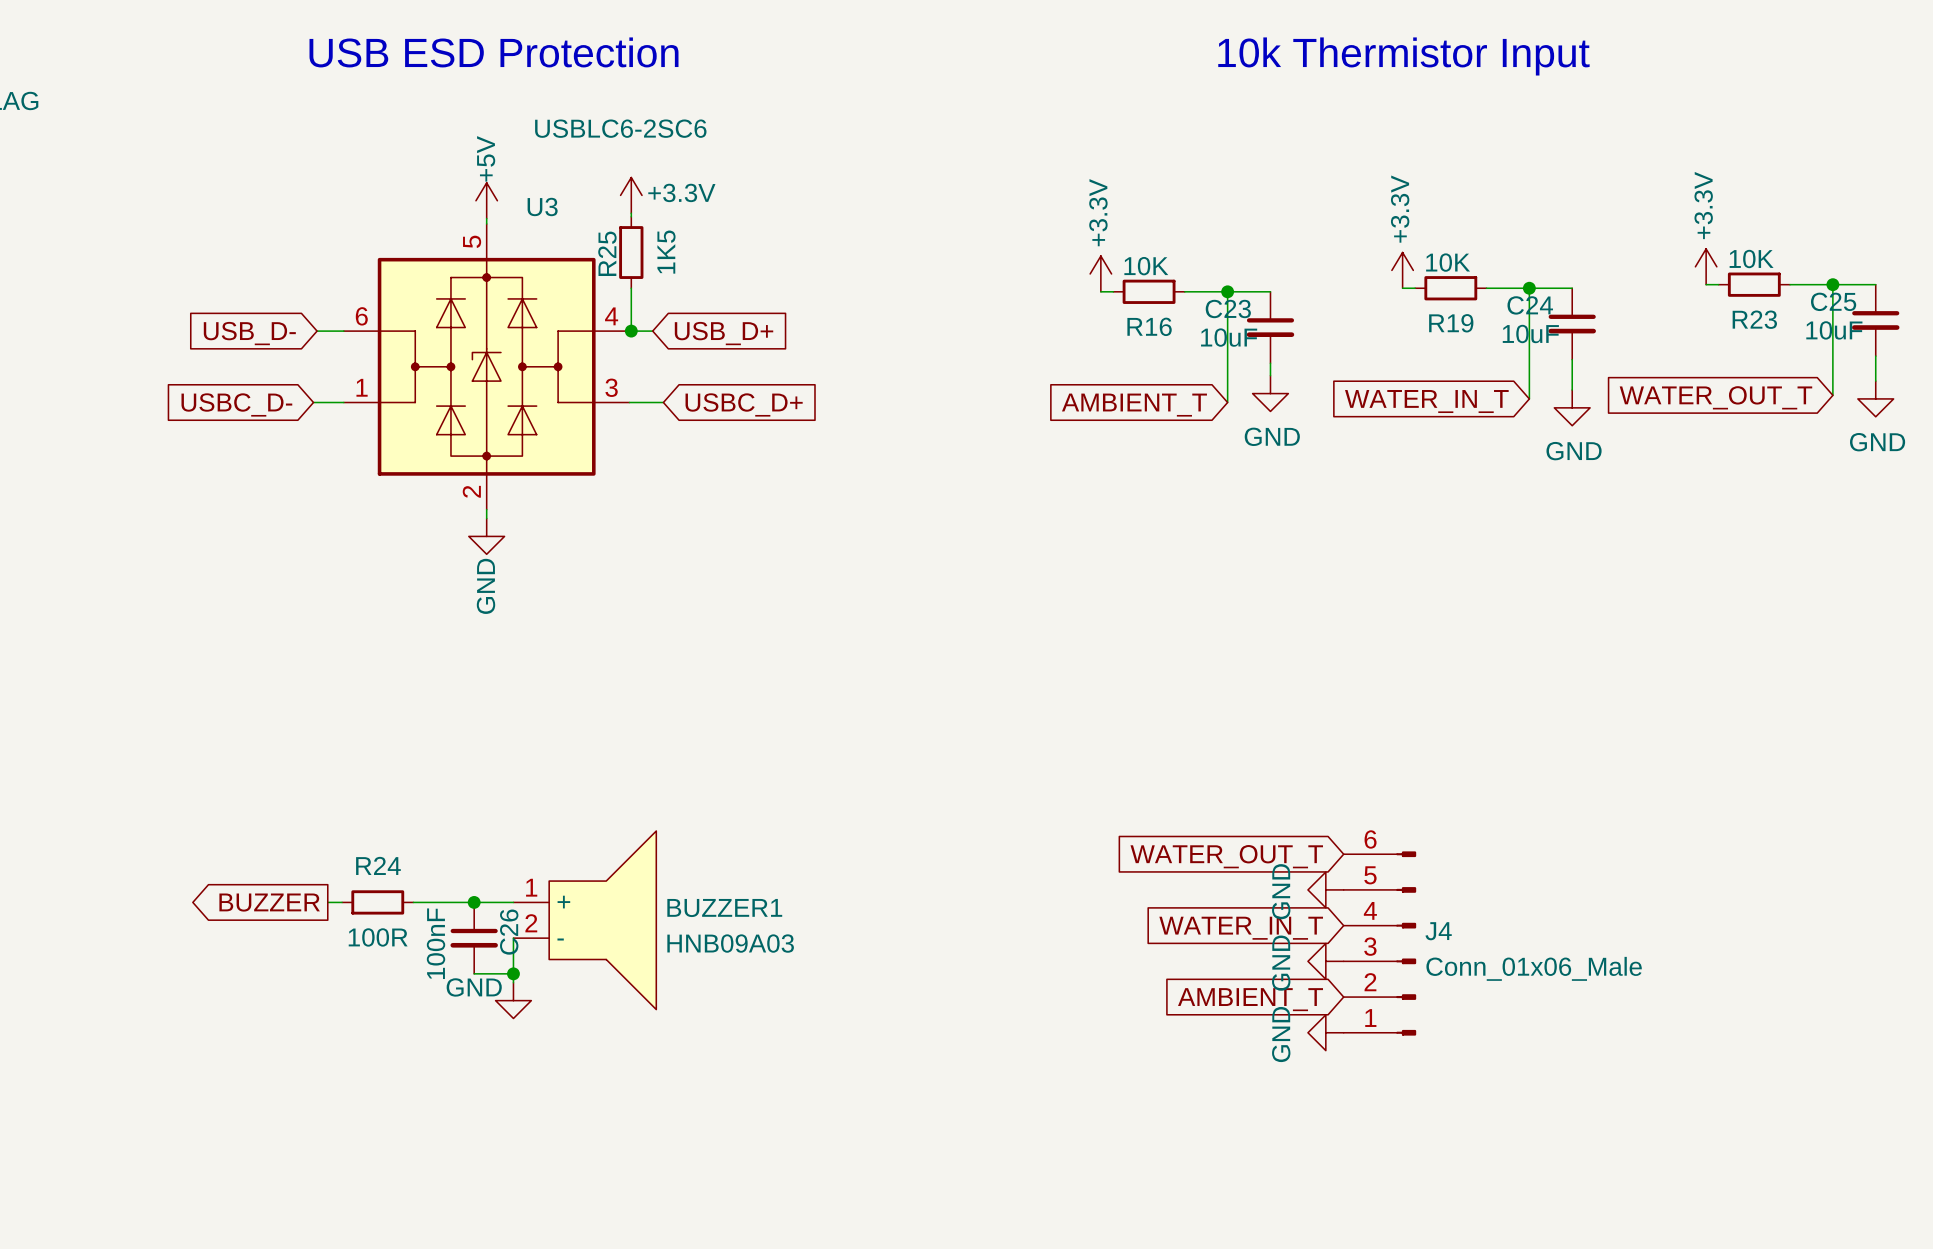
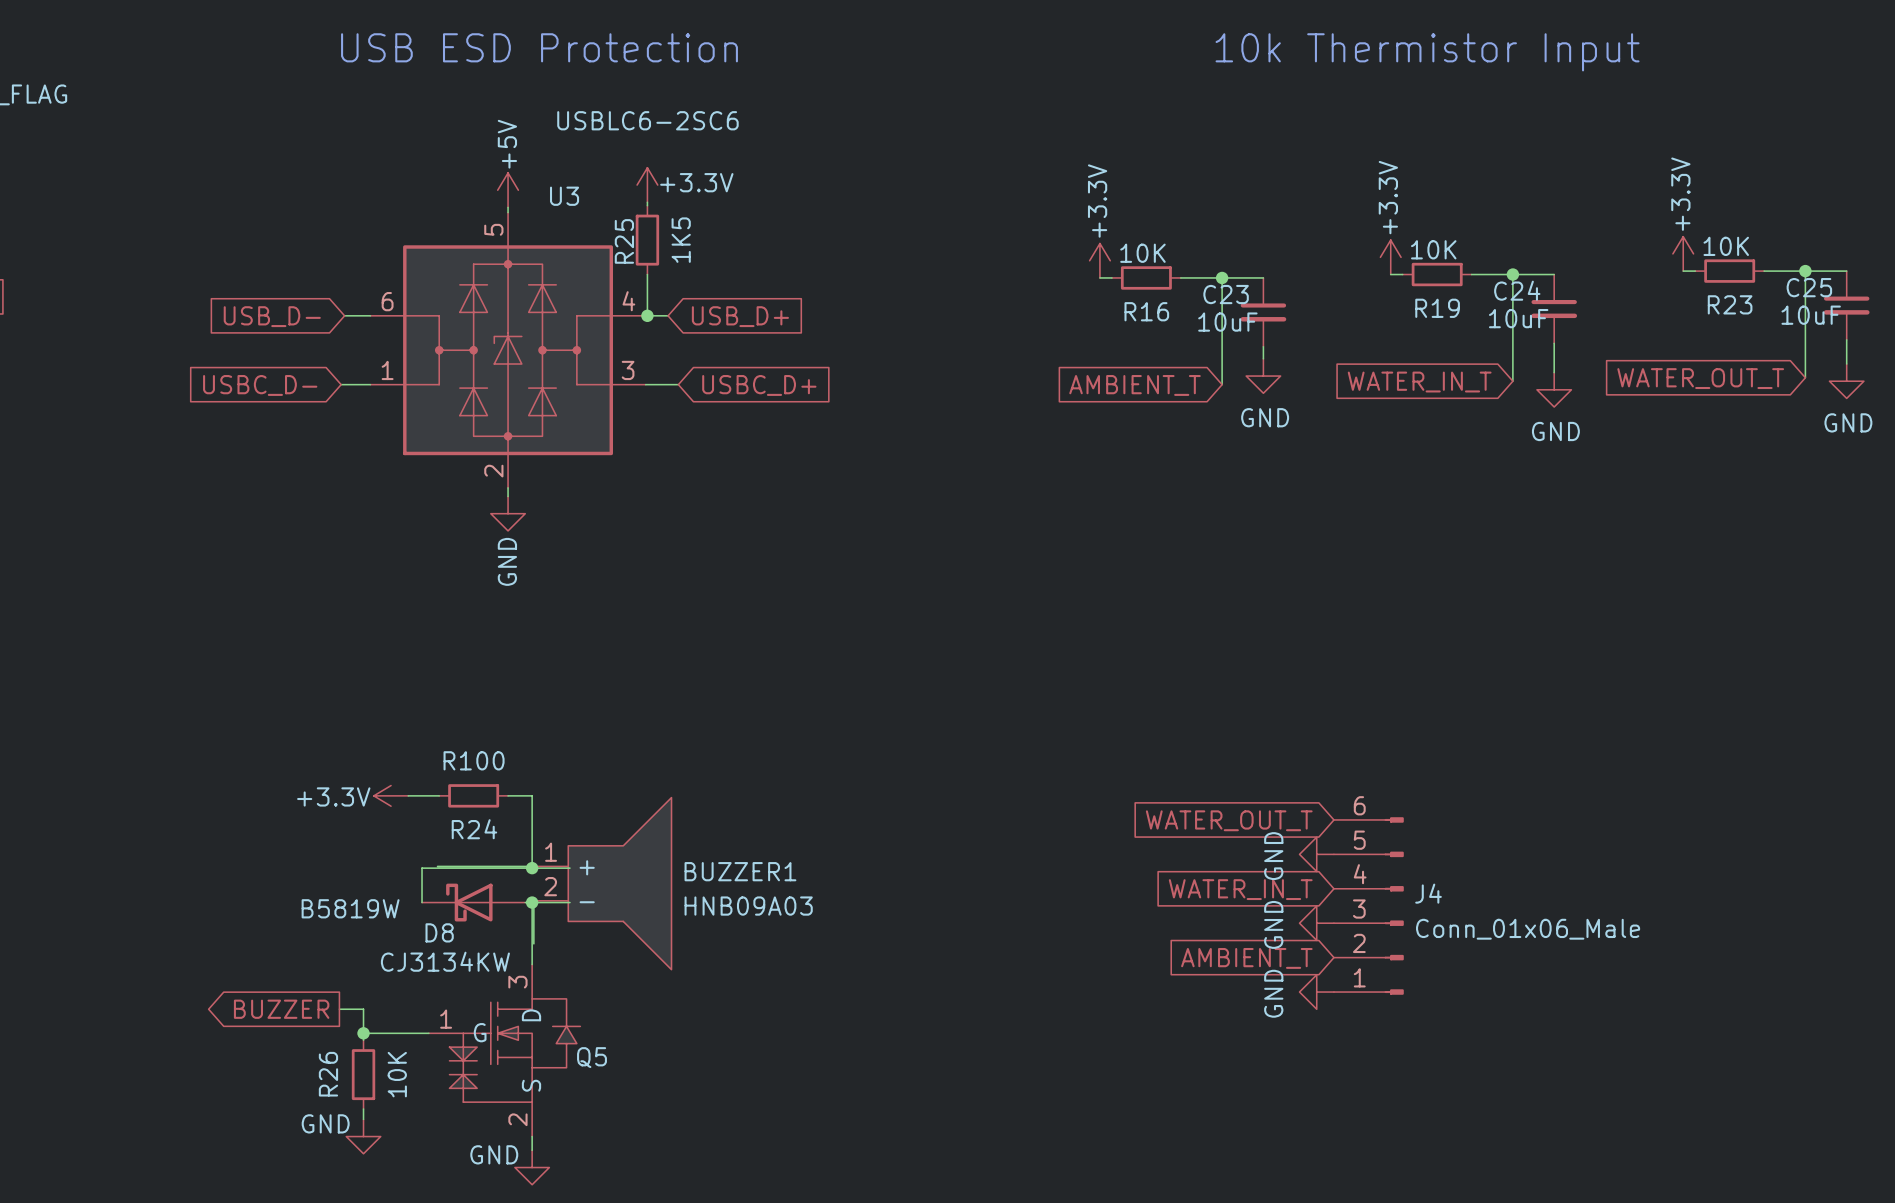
power symbol: none -> +3.3V (391, 795)
wire: none -> (408, 795) (439, 795)
wire: none -> (508, 795) (532, 795) (532, 868)
R24 name position: R24 (378, 865) -> R24 (474, 829)
global label position: BUZZER (269, 902) -> BUZZER (281, 1009)
wire: (327, 902) (342, 902) -> none
R24 position: (377, 902) -> (473, 795)
junction: (474, 902) -> none
junction: none -> (532, 868)
wire: none -> (569, 868) (422, 868) (422, 902)
R24 value: 100R (378, 937) -> R100 (474, 760)
C26: 100nF (474, 938) -> none
D8: none -> B5819W (473, 902)
wire: none -> (525, 902) (569, 902)
wire: none -> (532, 902) (532, 964)
junction: none -> (532, 902)
wire: (474, 973) (513, 973) -> none
junction: (513, 973) -> none
power symbol: GND (513, 1000) -> none
wire: none -> (339, 1009) (363, 1009) (363, 1040)
wire: none -> (363, 1033) (428, 1033)
junction: none -> (363, 1033)
Q5: none -> CJ3134KW (504, 1050)
R26: none -> 10K (363, 1074)
wire: none -> (363, 1109) (363, 1119)
power symbol: none -> GND (363, 1136)
wire: none -> (532, 1136) (532, 1150)
power symbol: none -> GND (532, 1167)

